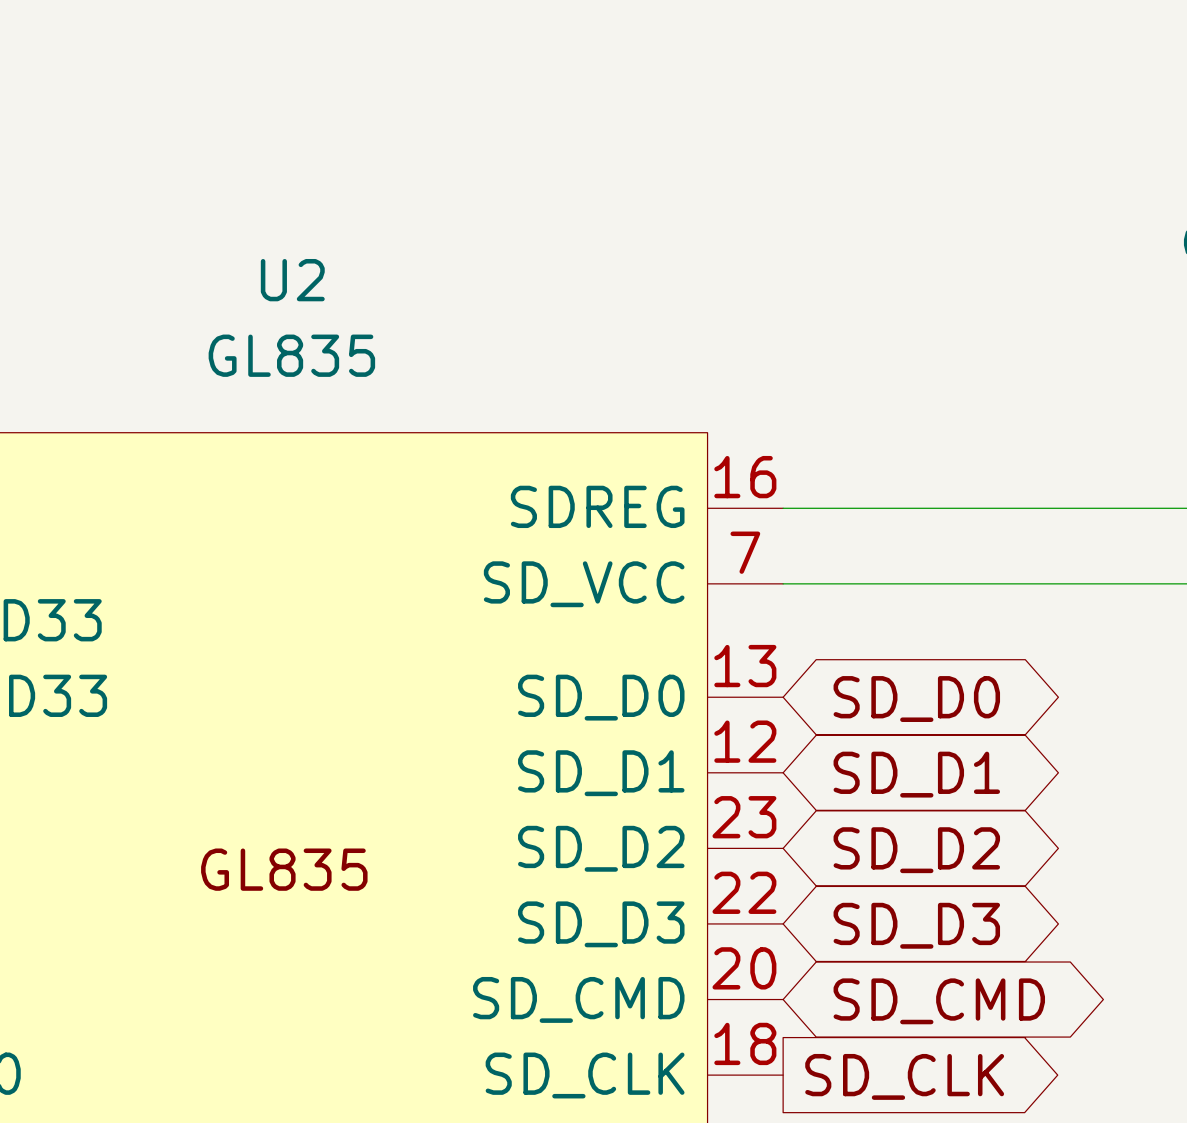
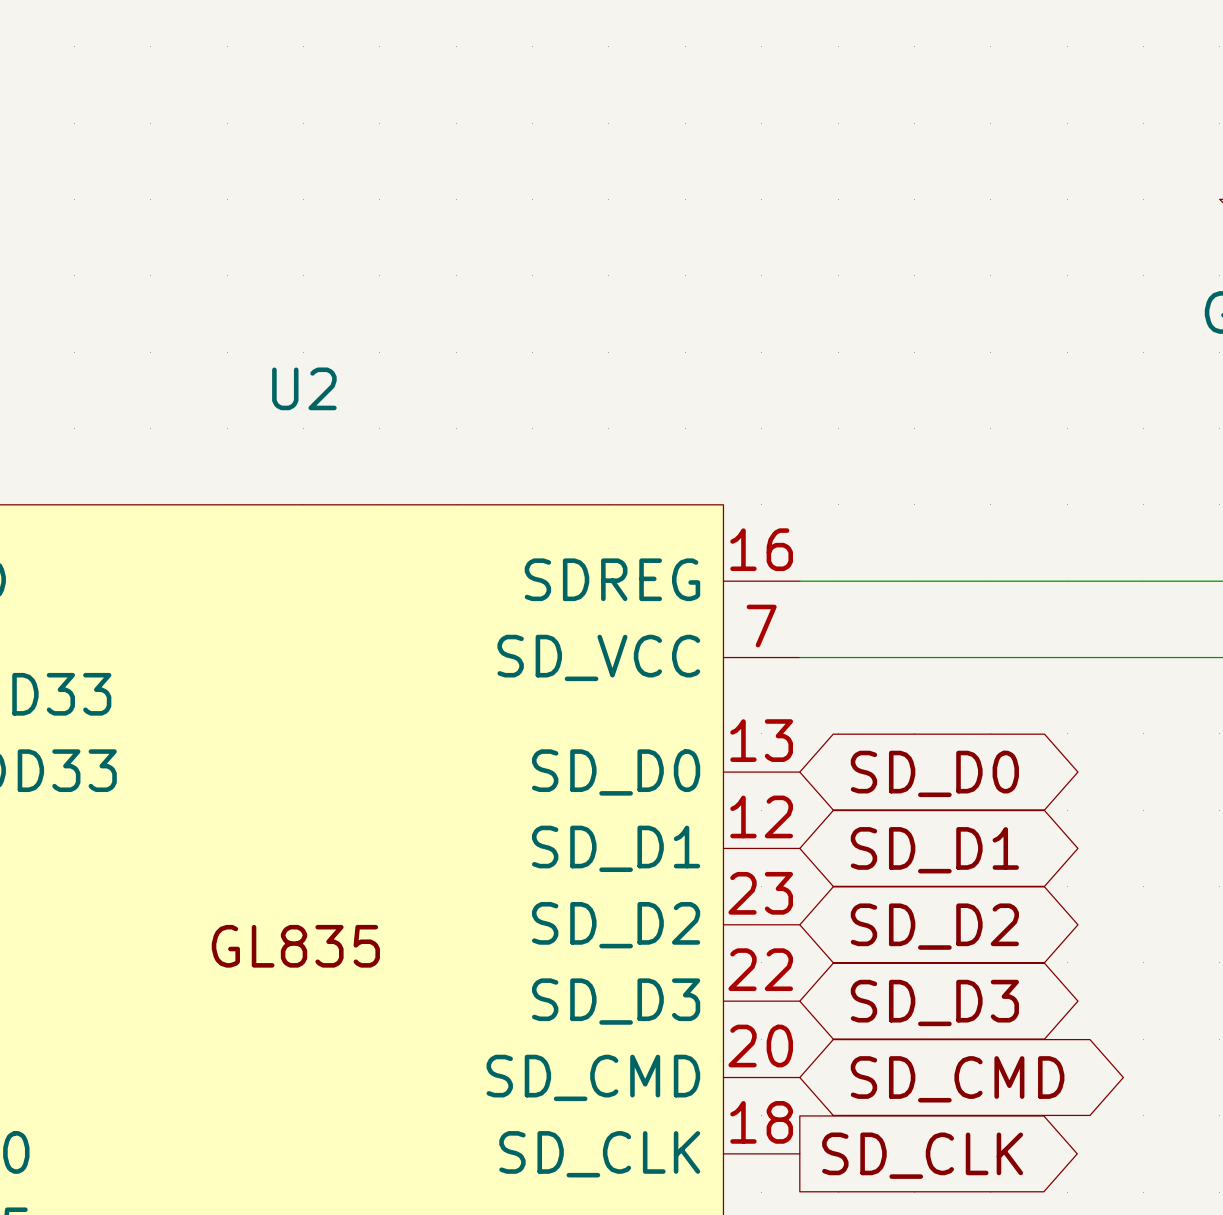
U2 name position: U2 (292, 280) -> U2 (304, 388)
U2 value: GL835 (291, 355) -> none

